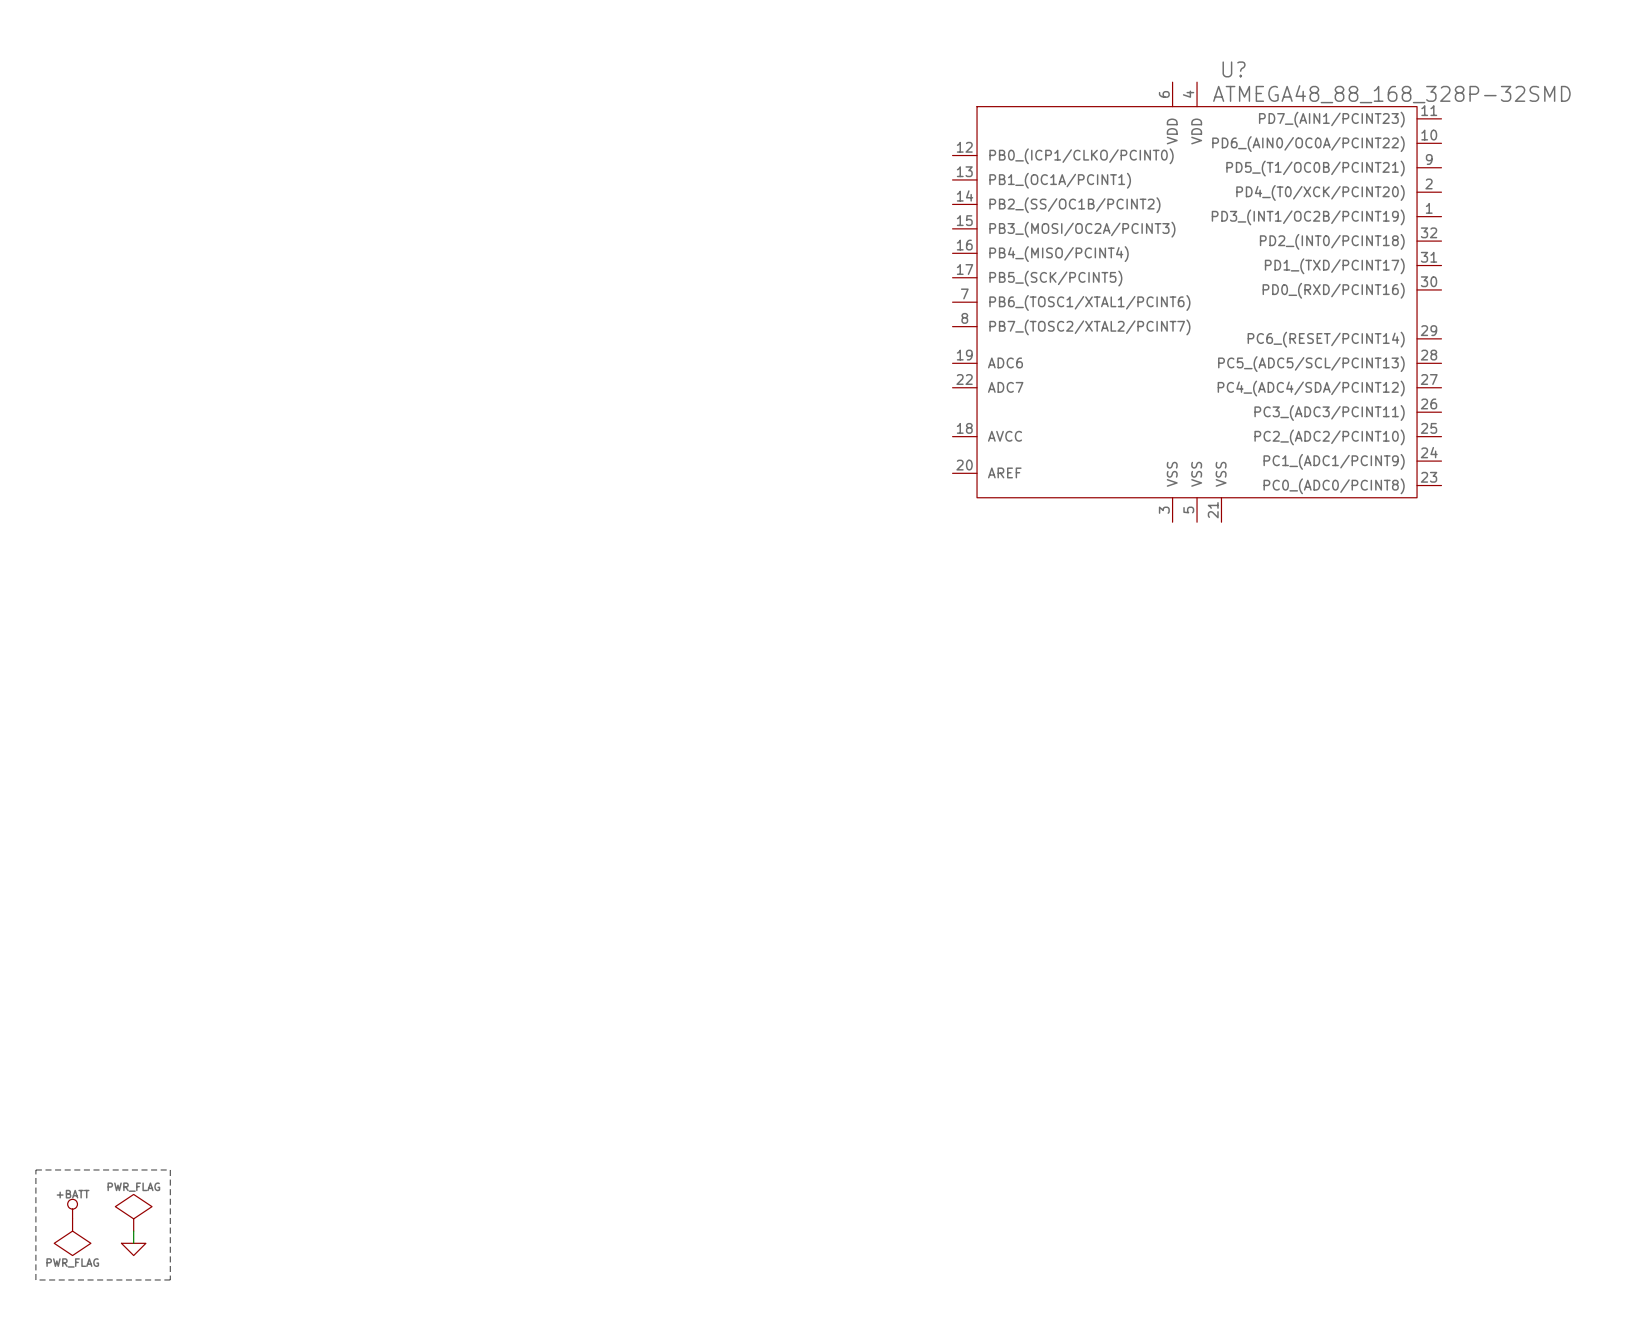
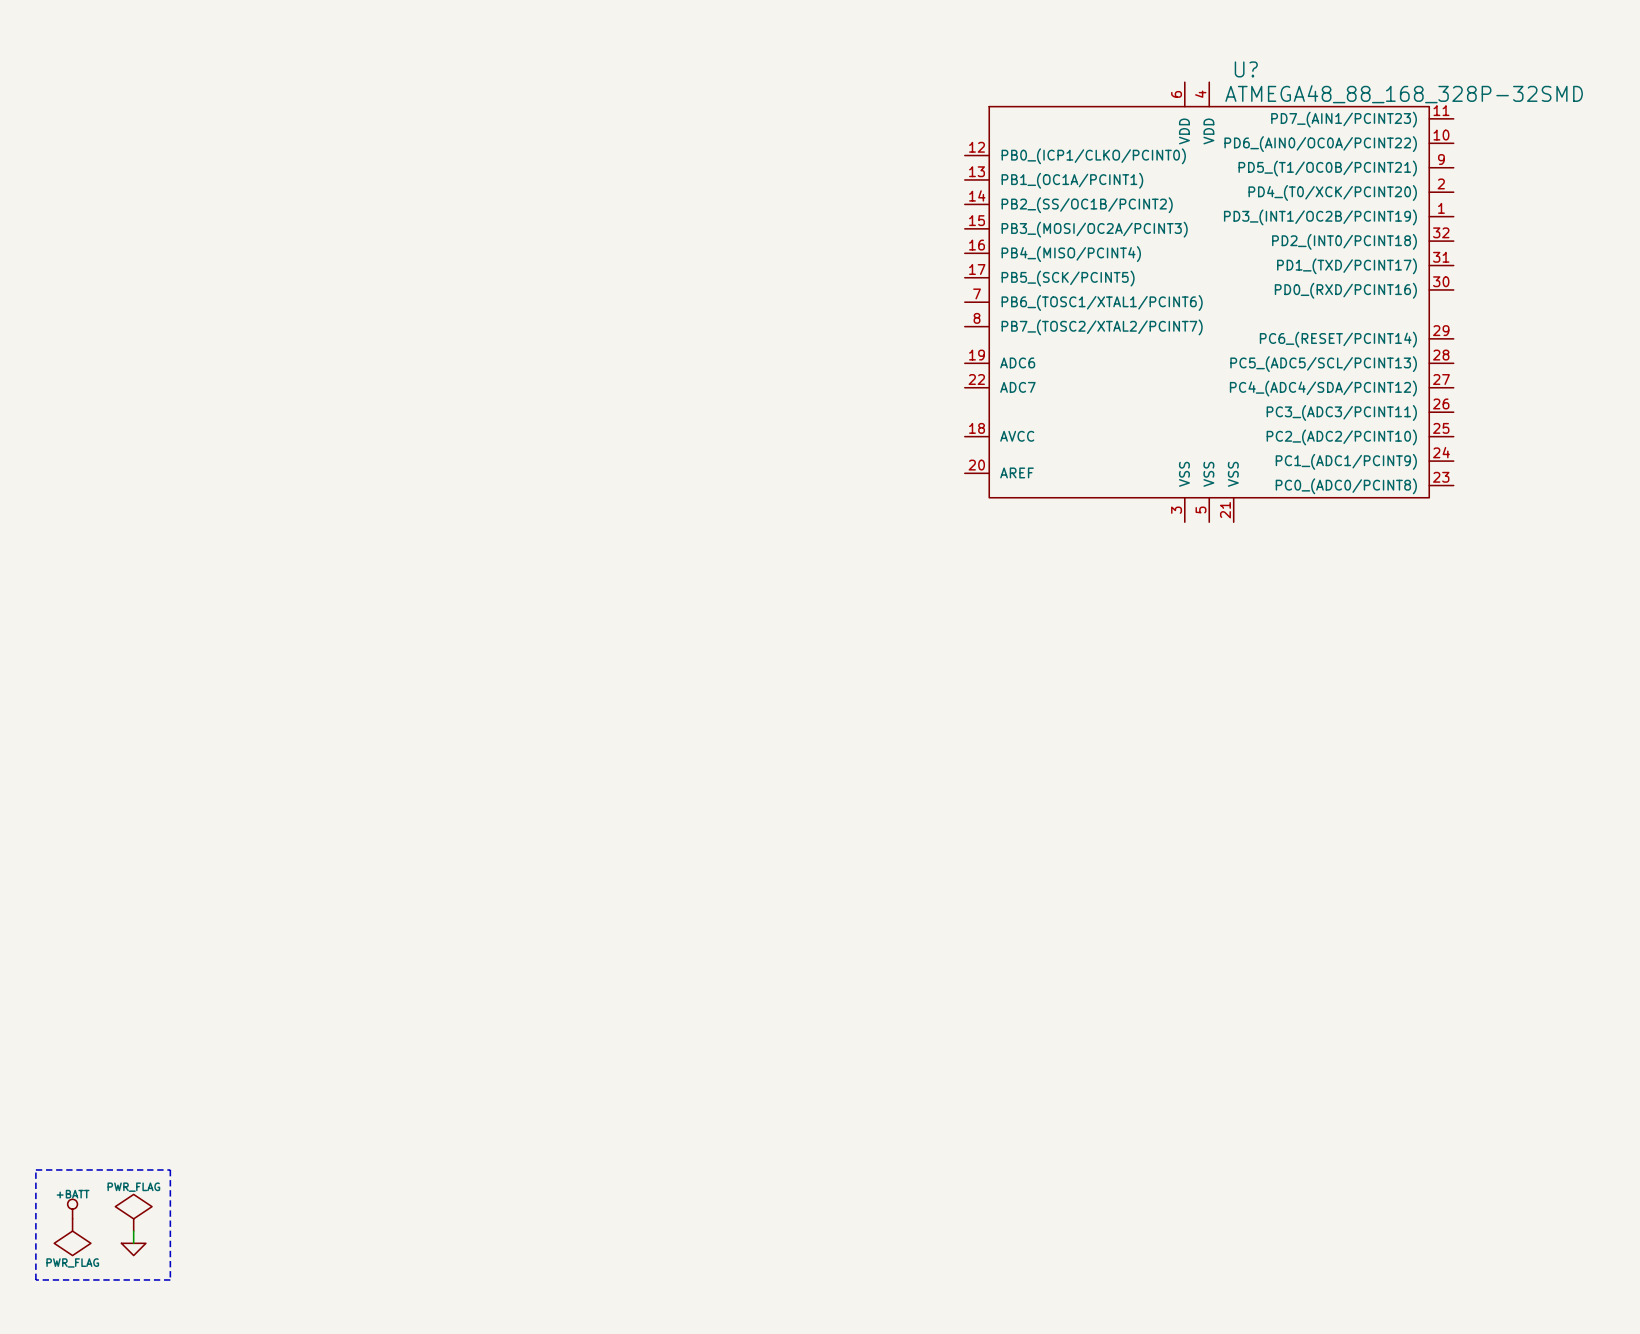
U? position: (1197, 302) -> (1209, 302)

